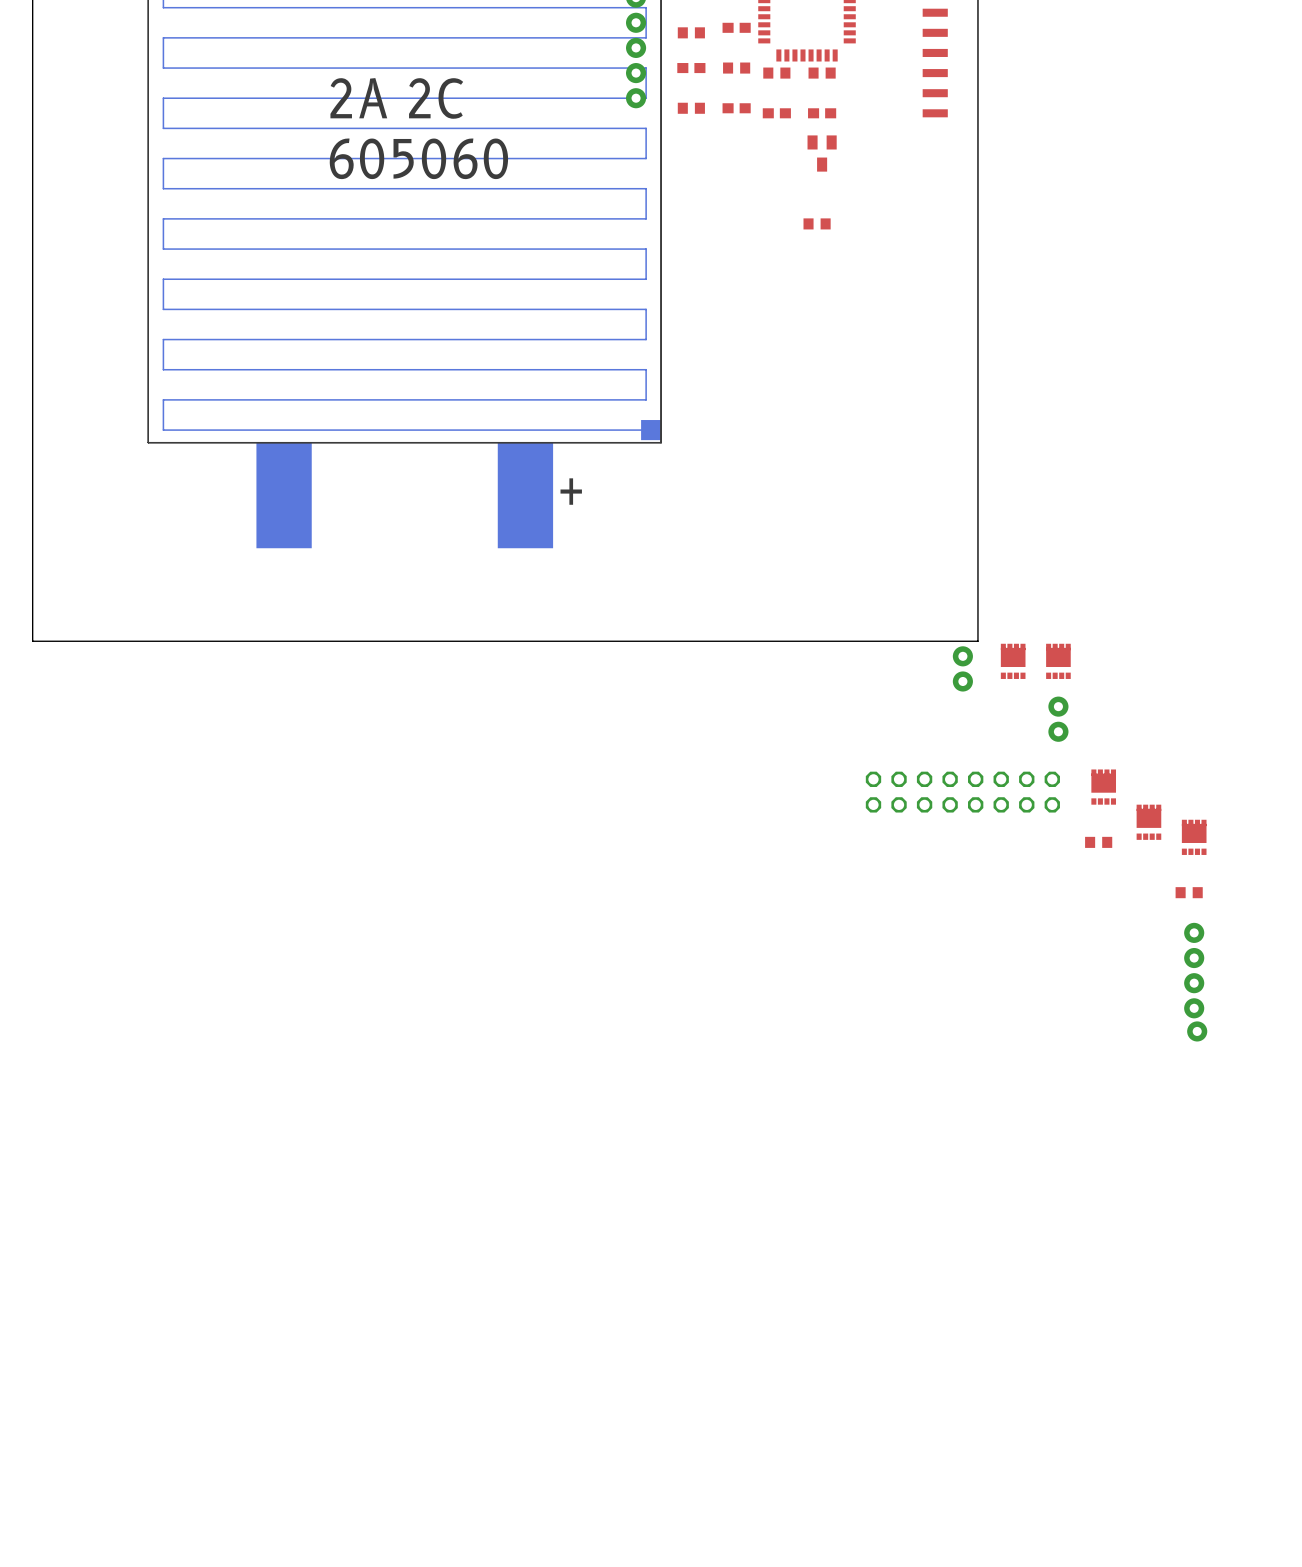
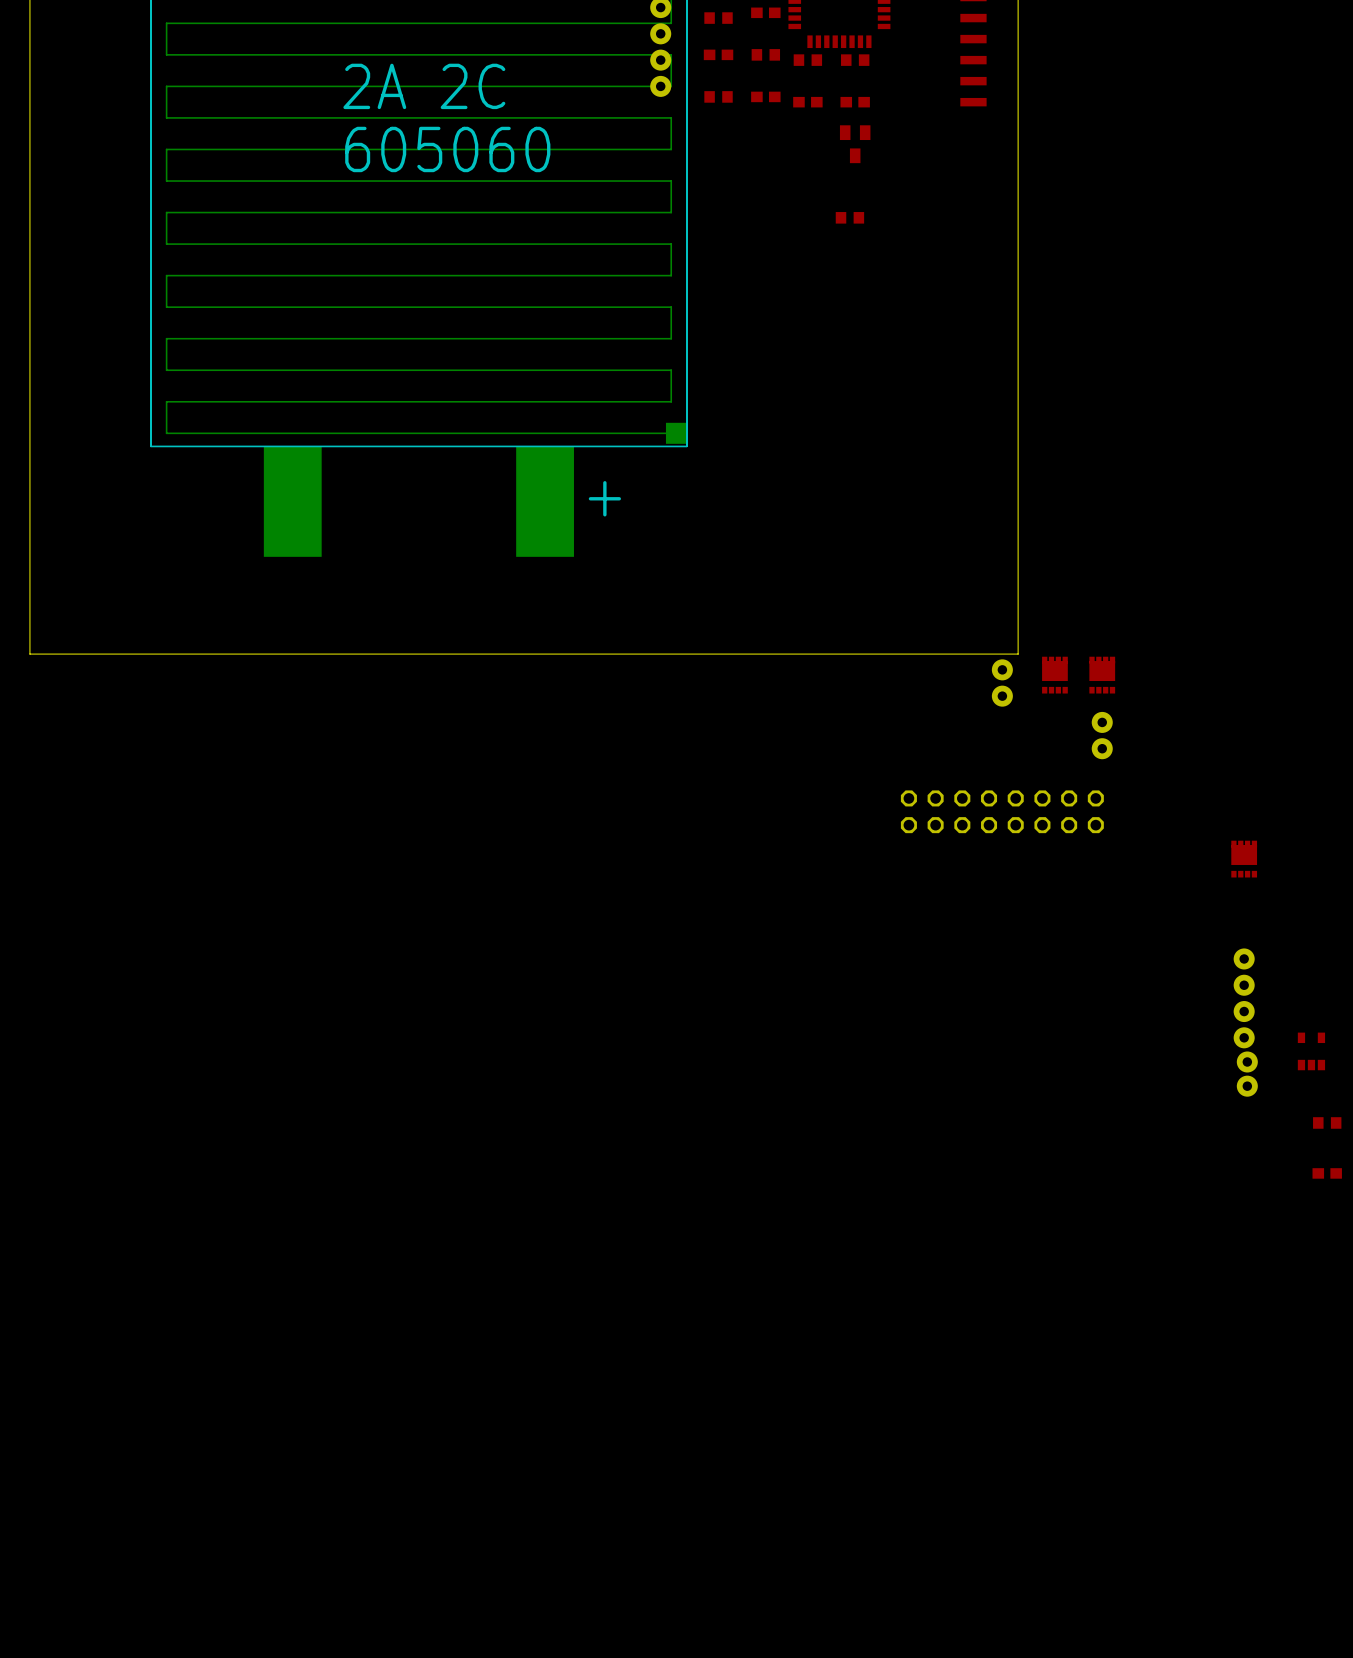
part: (1103, 787) -> none
part: (1148, 822) -> none
part: (1098, 842) -> none
part: (1189, 892) -> none
part: none -> (1311, 1051)
part: none -> (1247, 1086)
part: none -> (1327, 1122)
part: none -> (1327, 1173)

